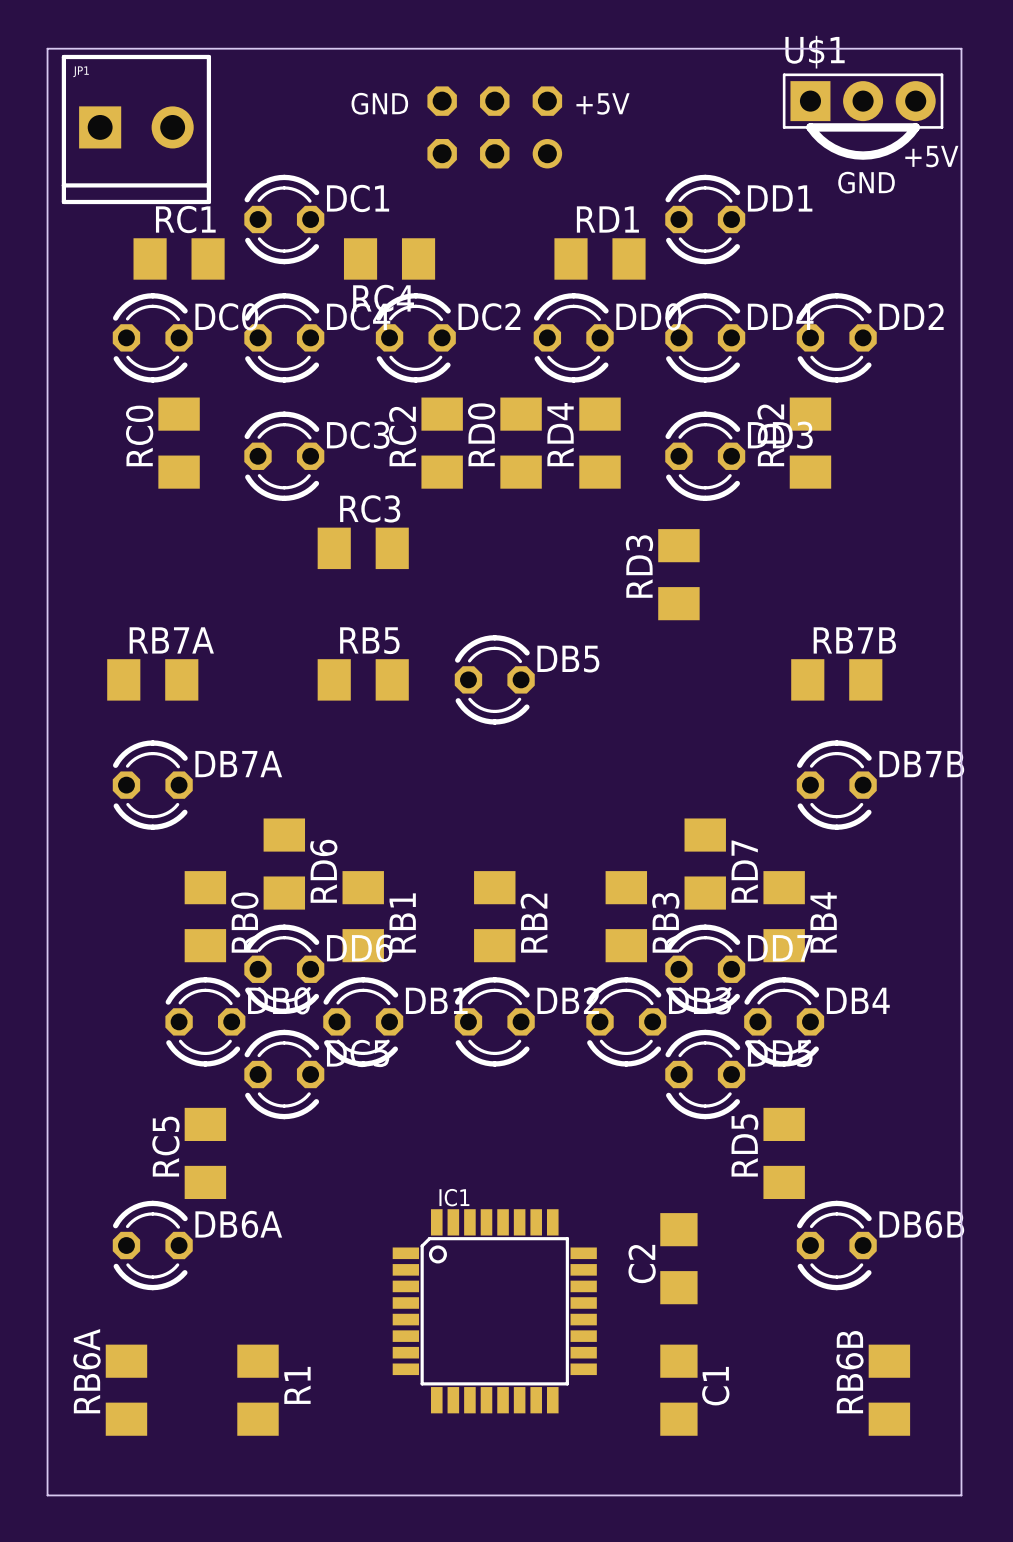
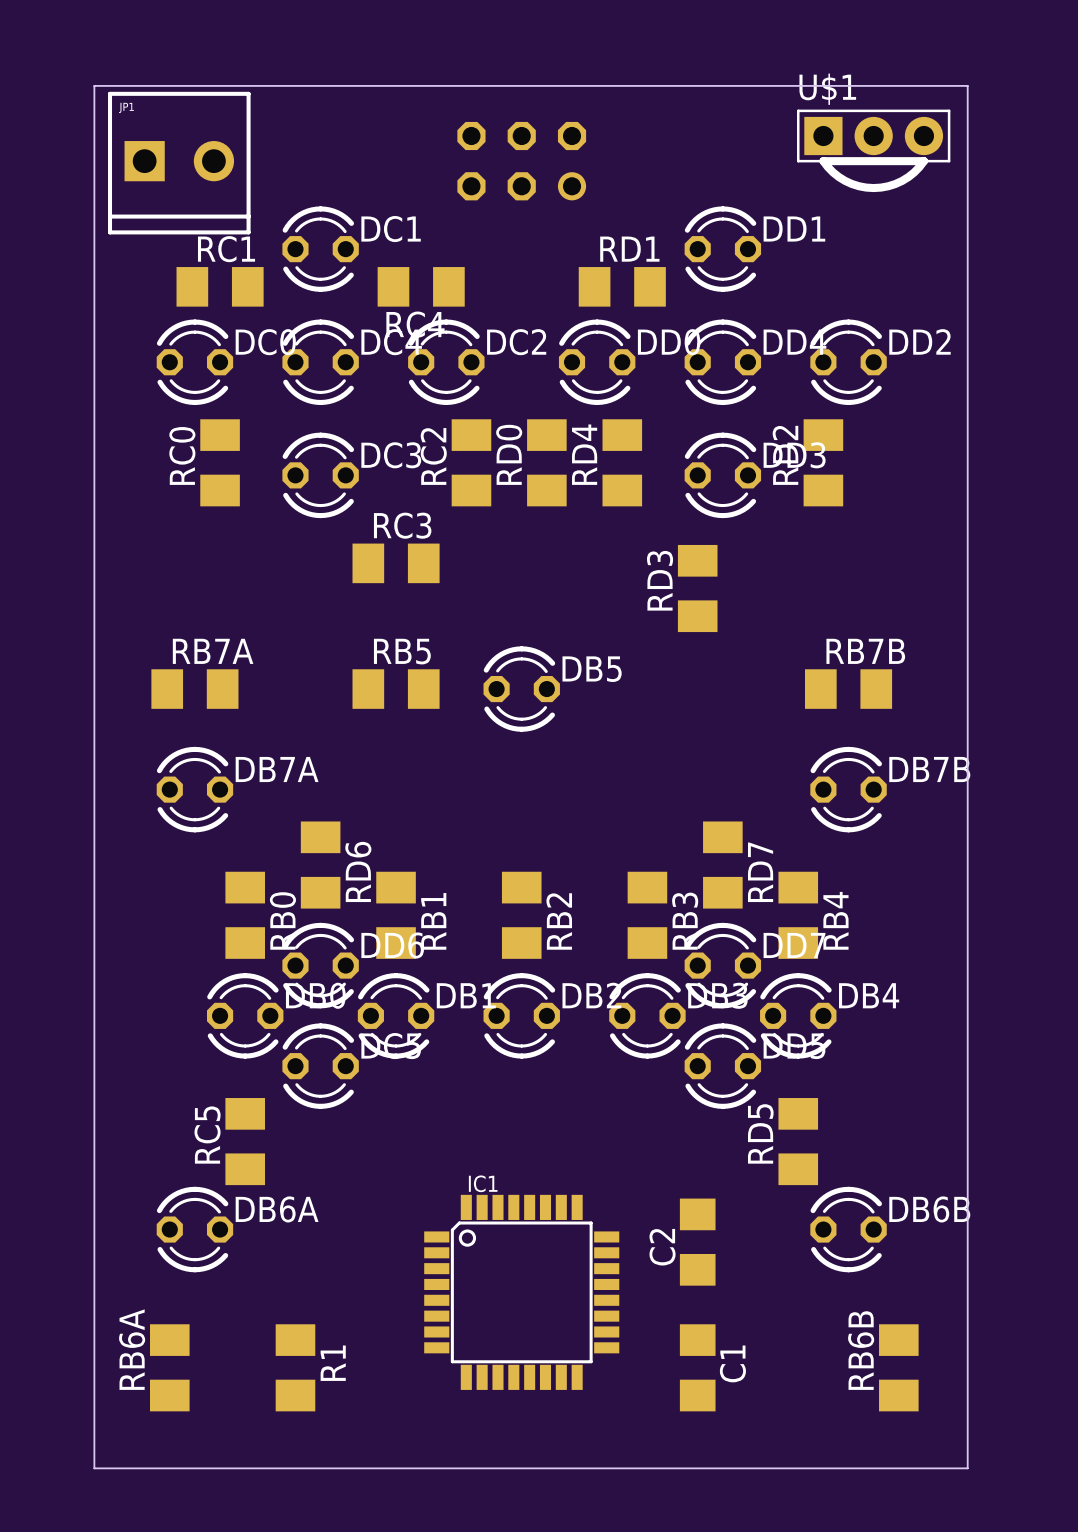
text: GND (379, 103) -> none
text: +5V (603, 103) -> none
text: +5V (931, 156) -> none
text: GND (866, 182) -> none

